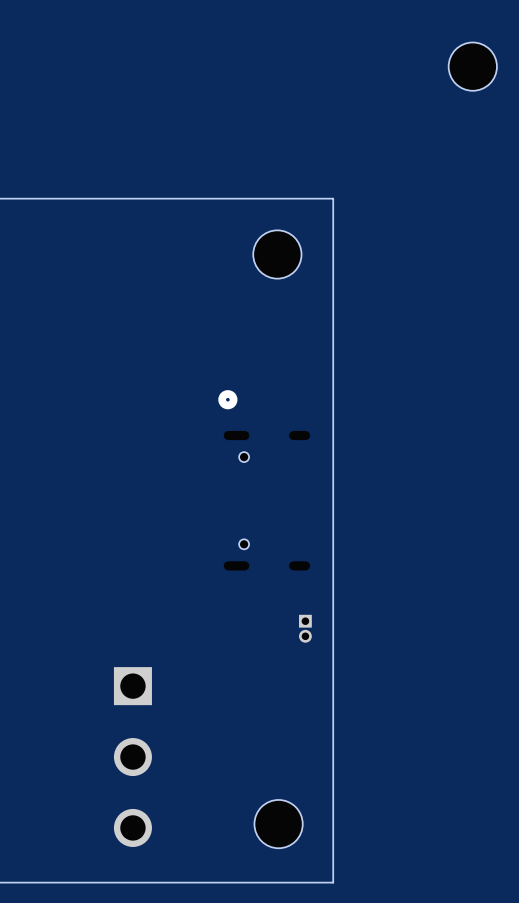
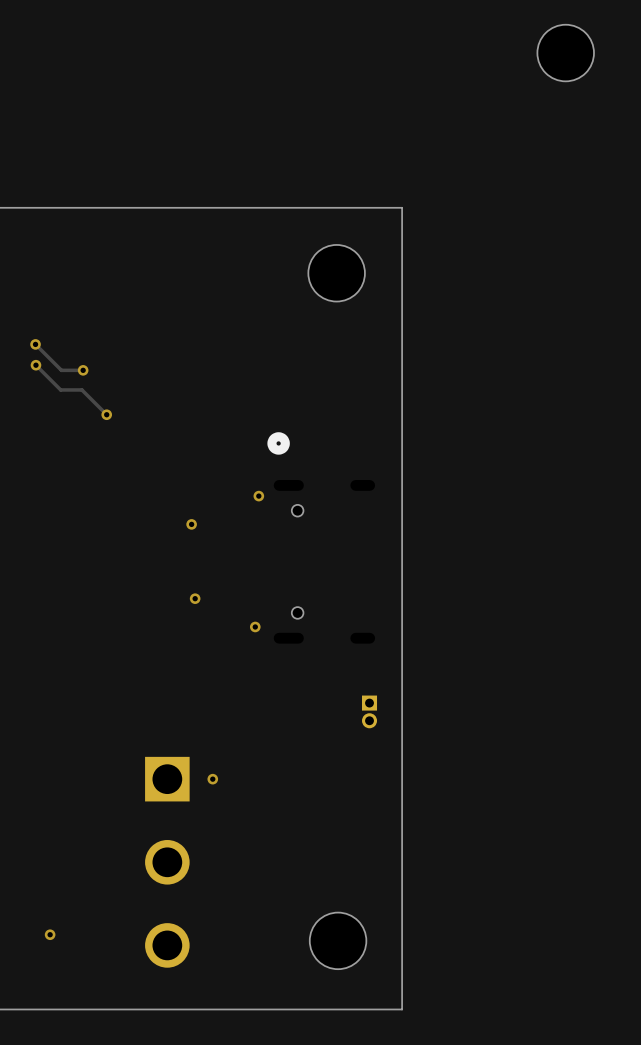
track: none -> (35, 344) (61, 370) (83, 370)
via: none -> (35, 344)
track: none -> (35, 365) (60, 389) (81, 389) (106, 414)
via: none -> (35, 365)
via: none -> (83, 370)
via: none -> (106, 414)
via: none -> (258, 496)
via: none -> (191, 524)
via: none -> (195, 598)
via: none -> (255, 626)
via: none -> (212, 779)
via: none -> (50, 934)

